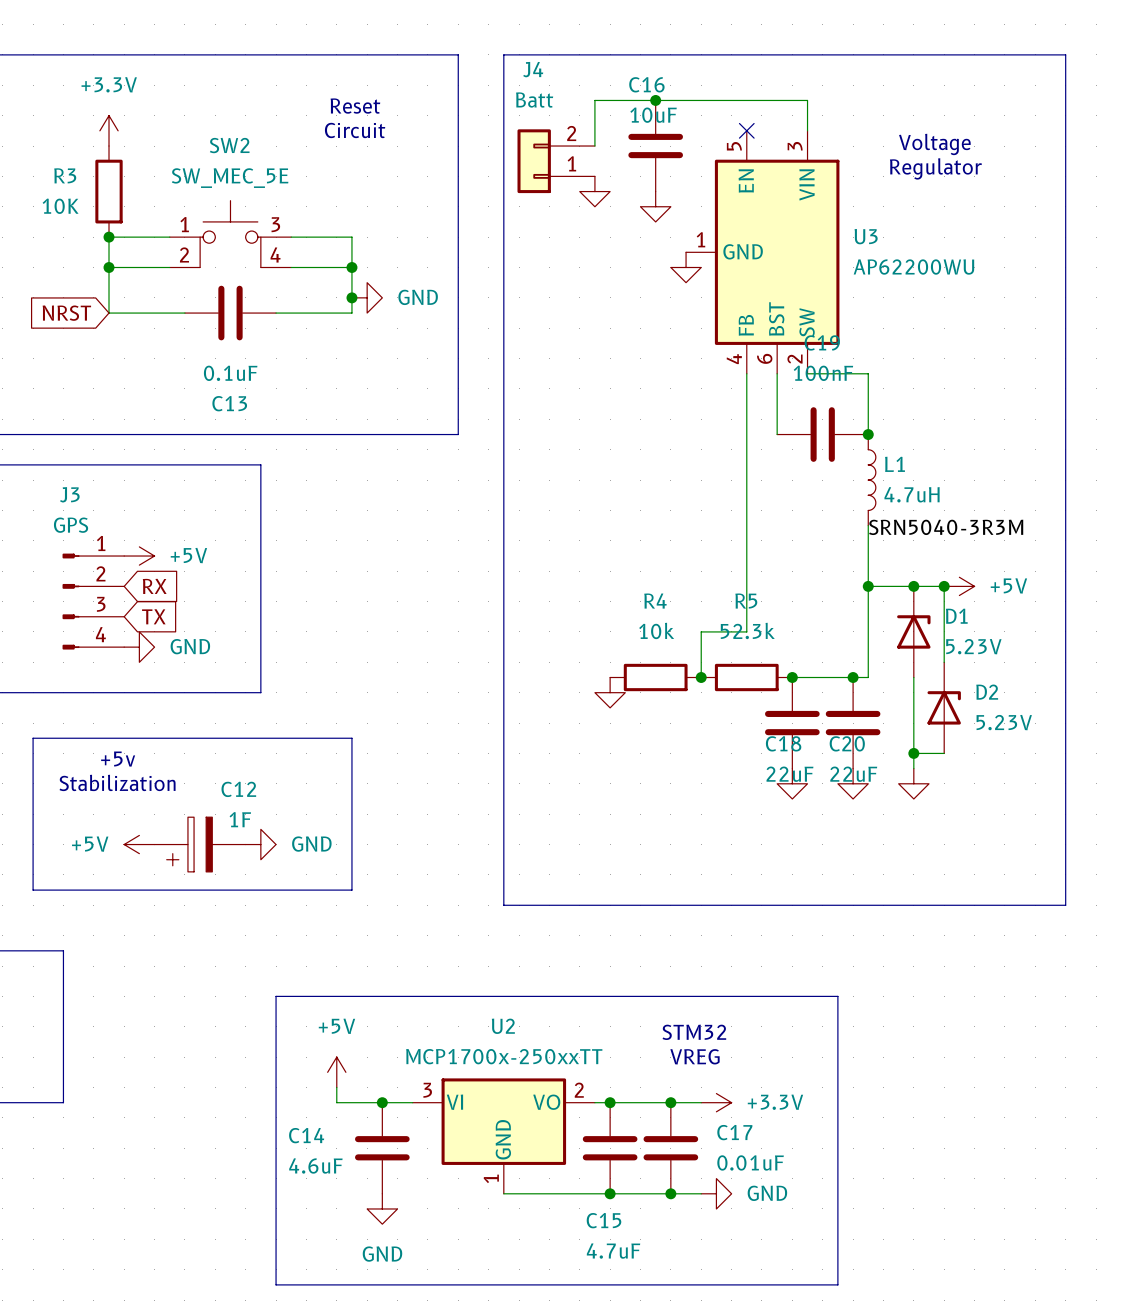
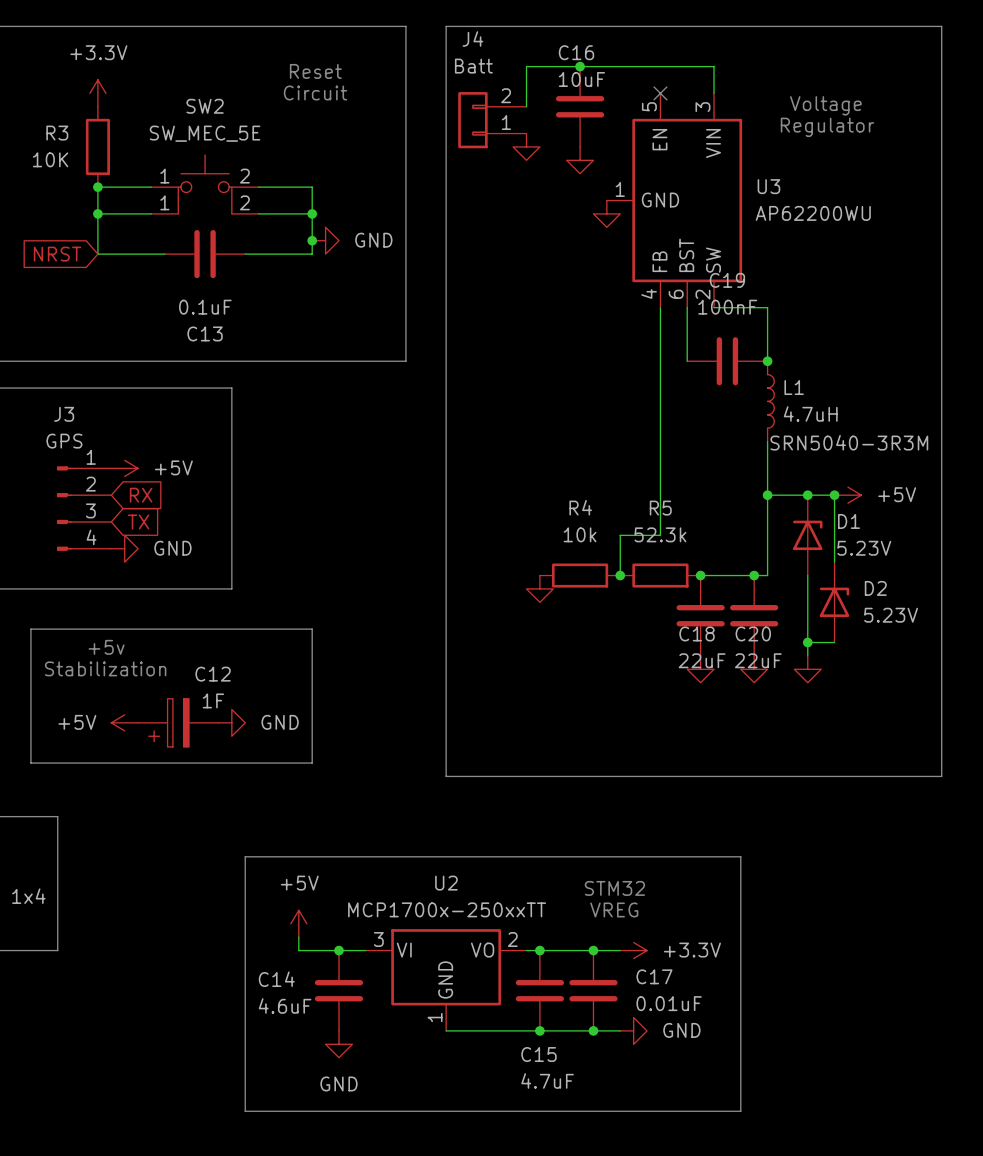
SW2 pin number: 3 (275, 224) -> 2 (244, 176)
SW2 pin number: 2 (184, 254) -> 1 (164, 202)
SW2 pin number: 4 (275, 254) -> 2 (244, 202)

